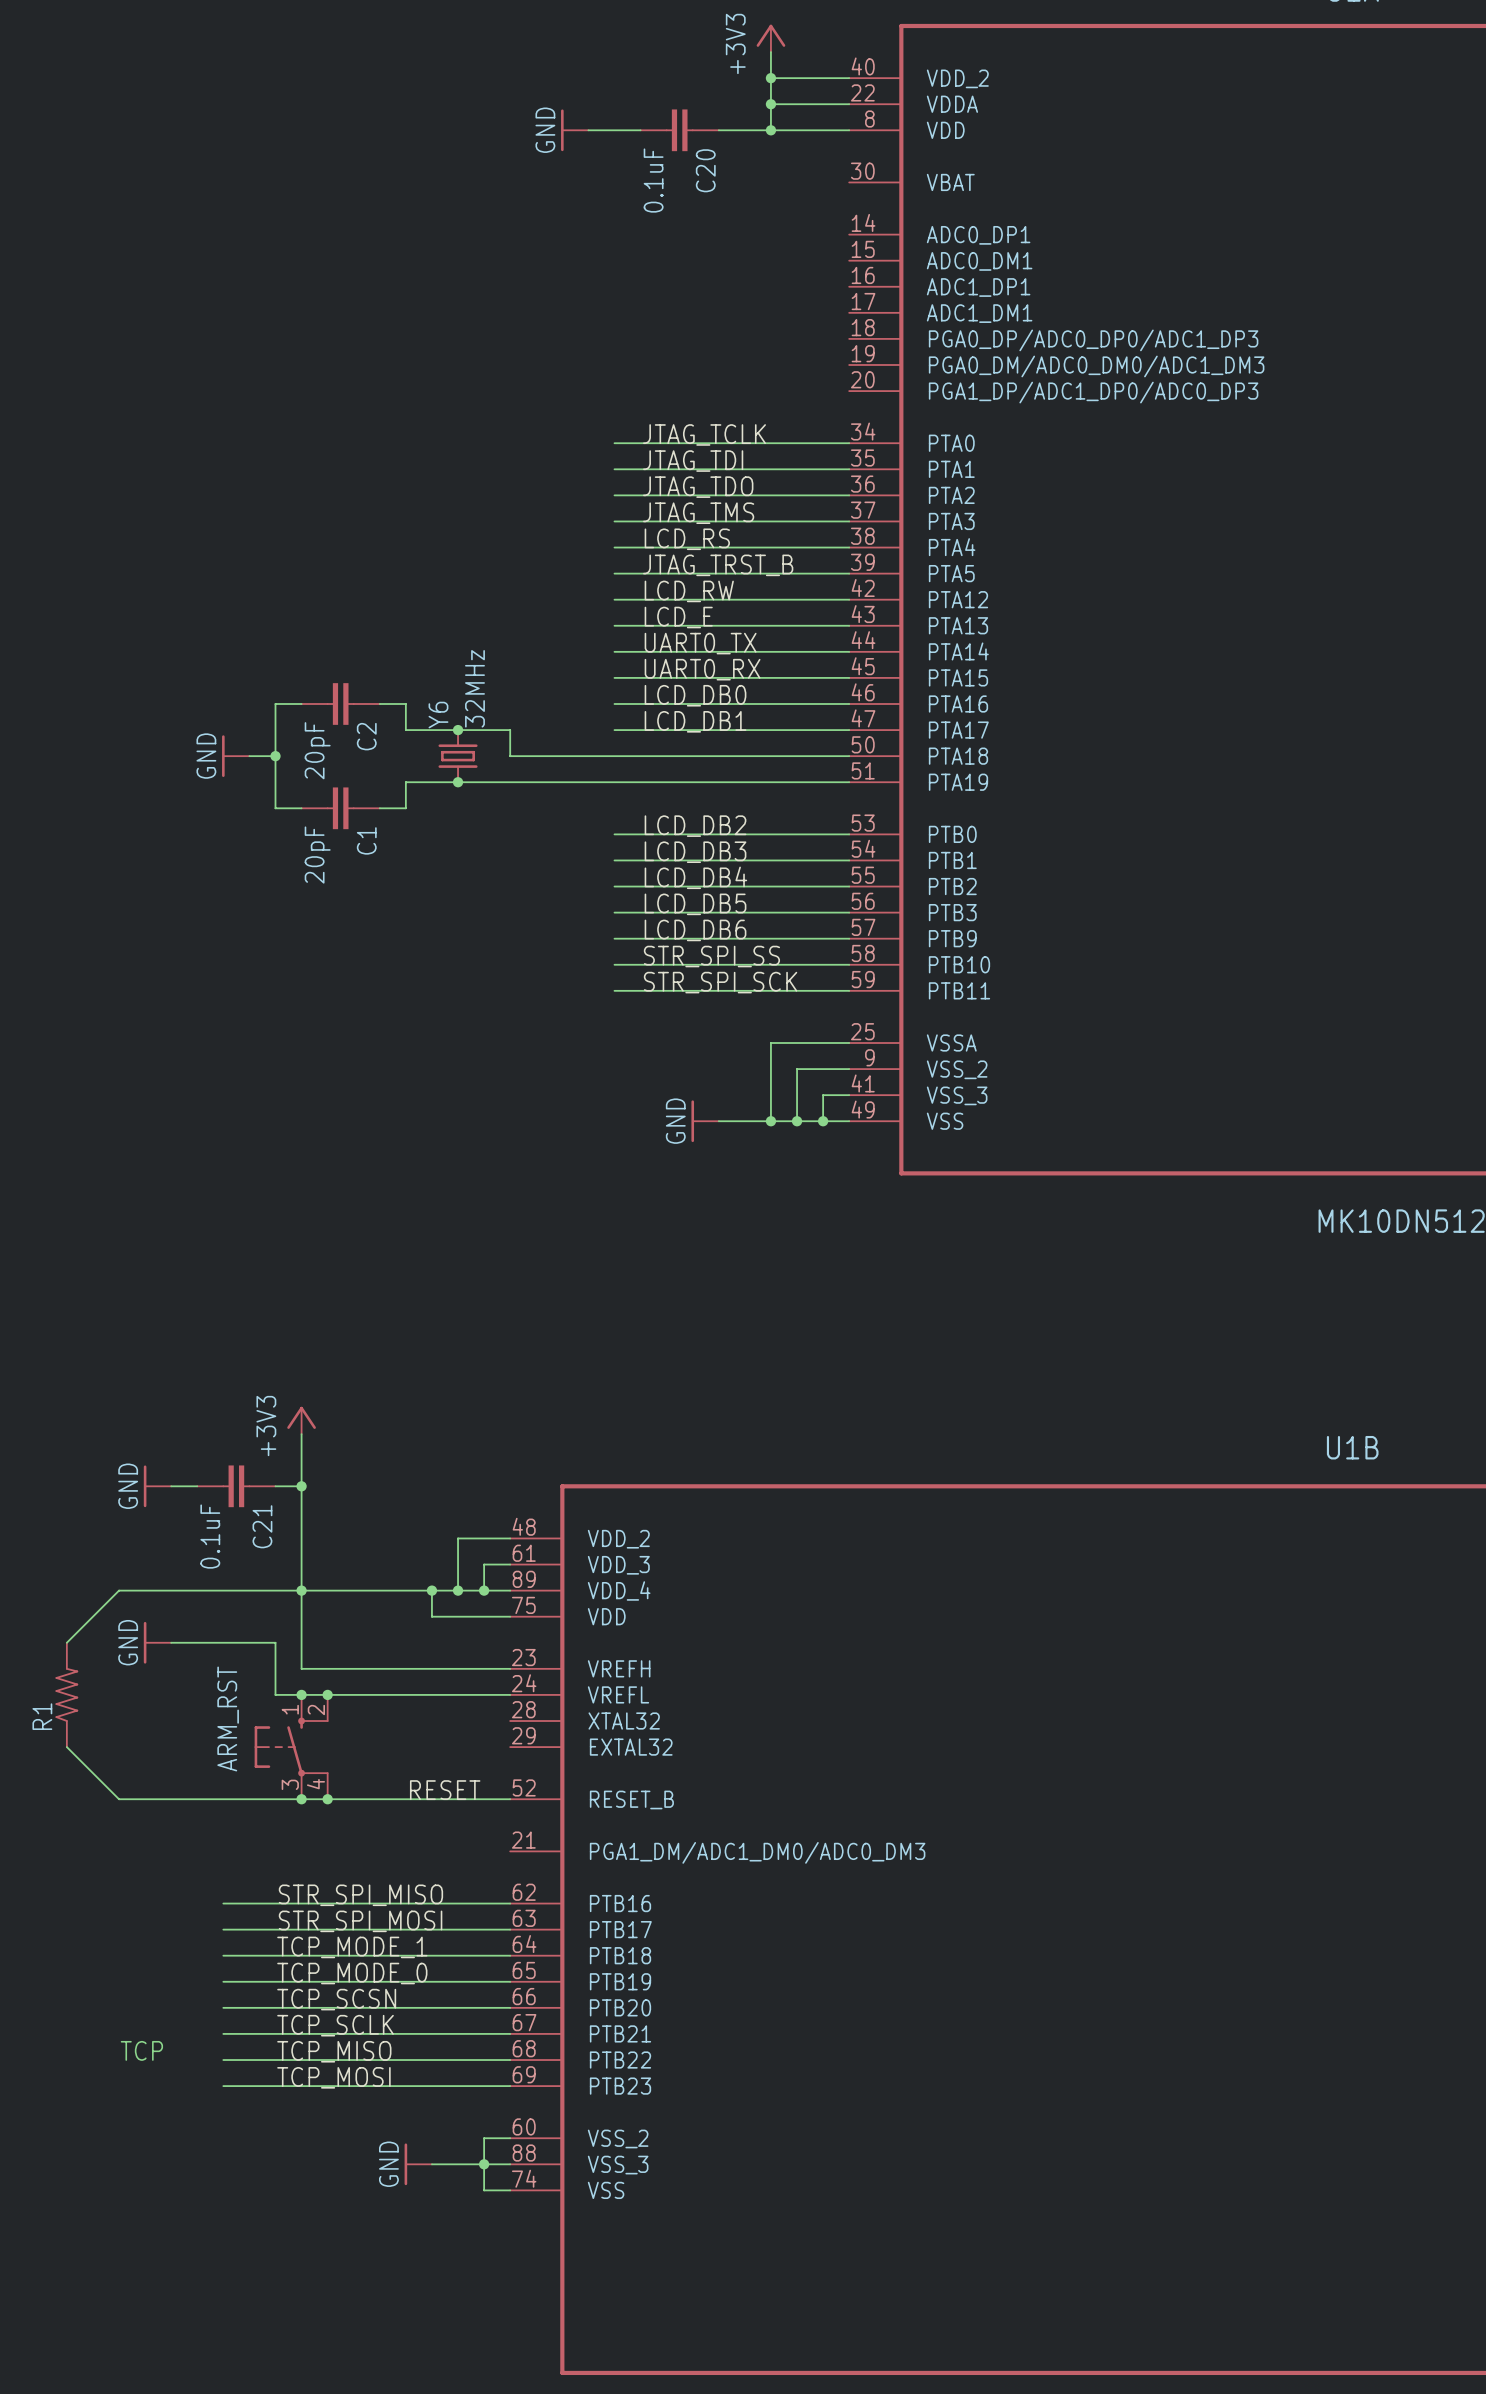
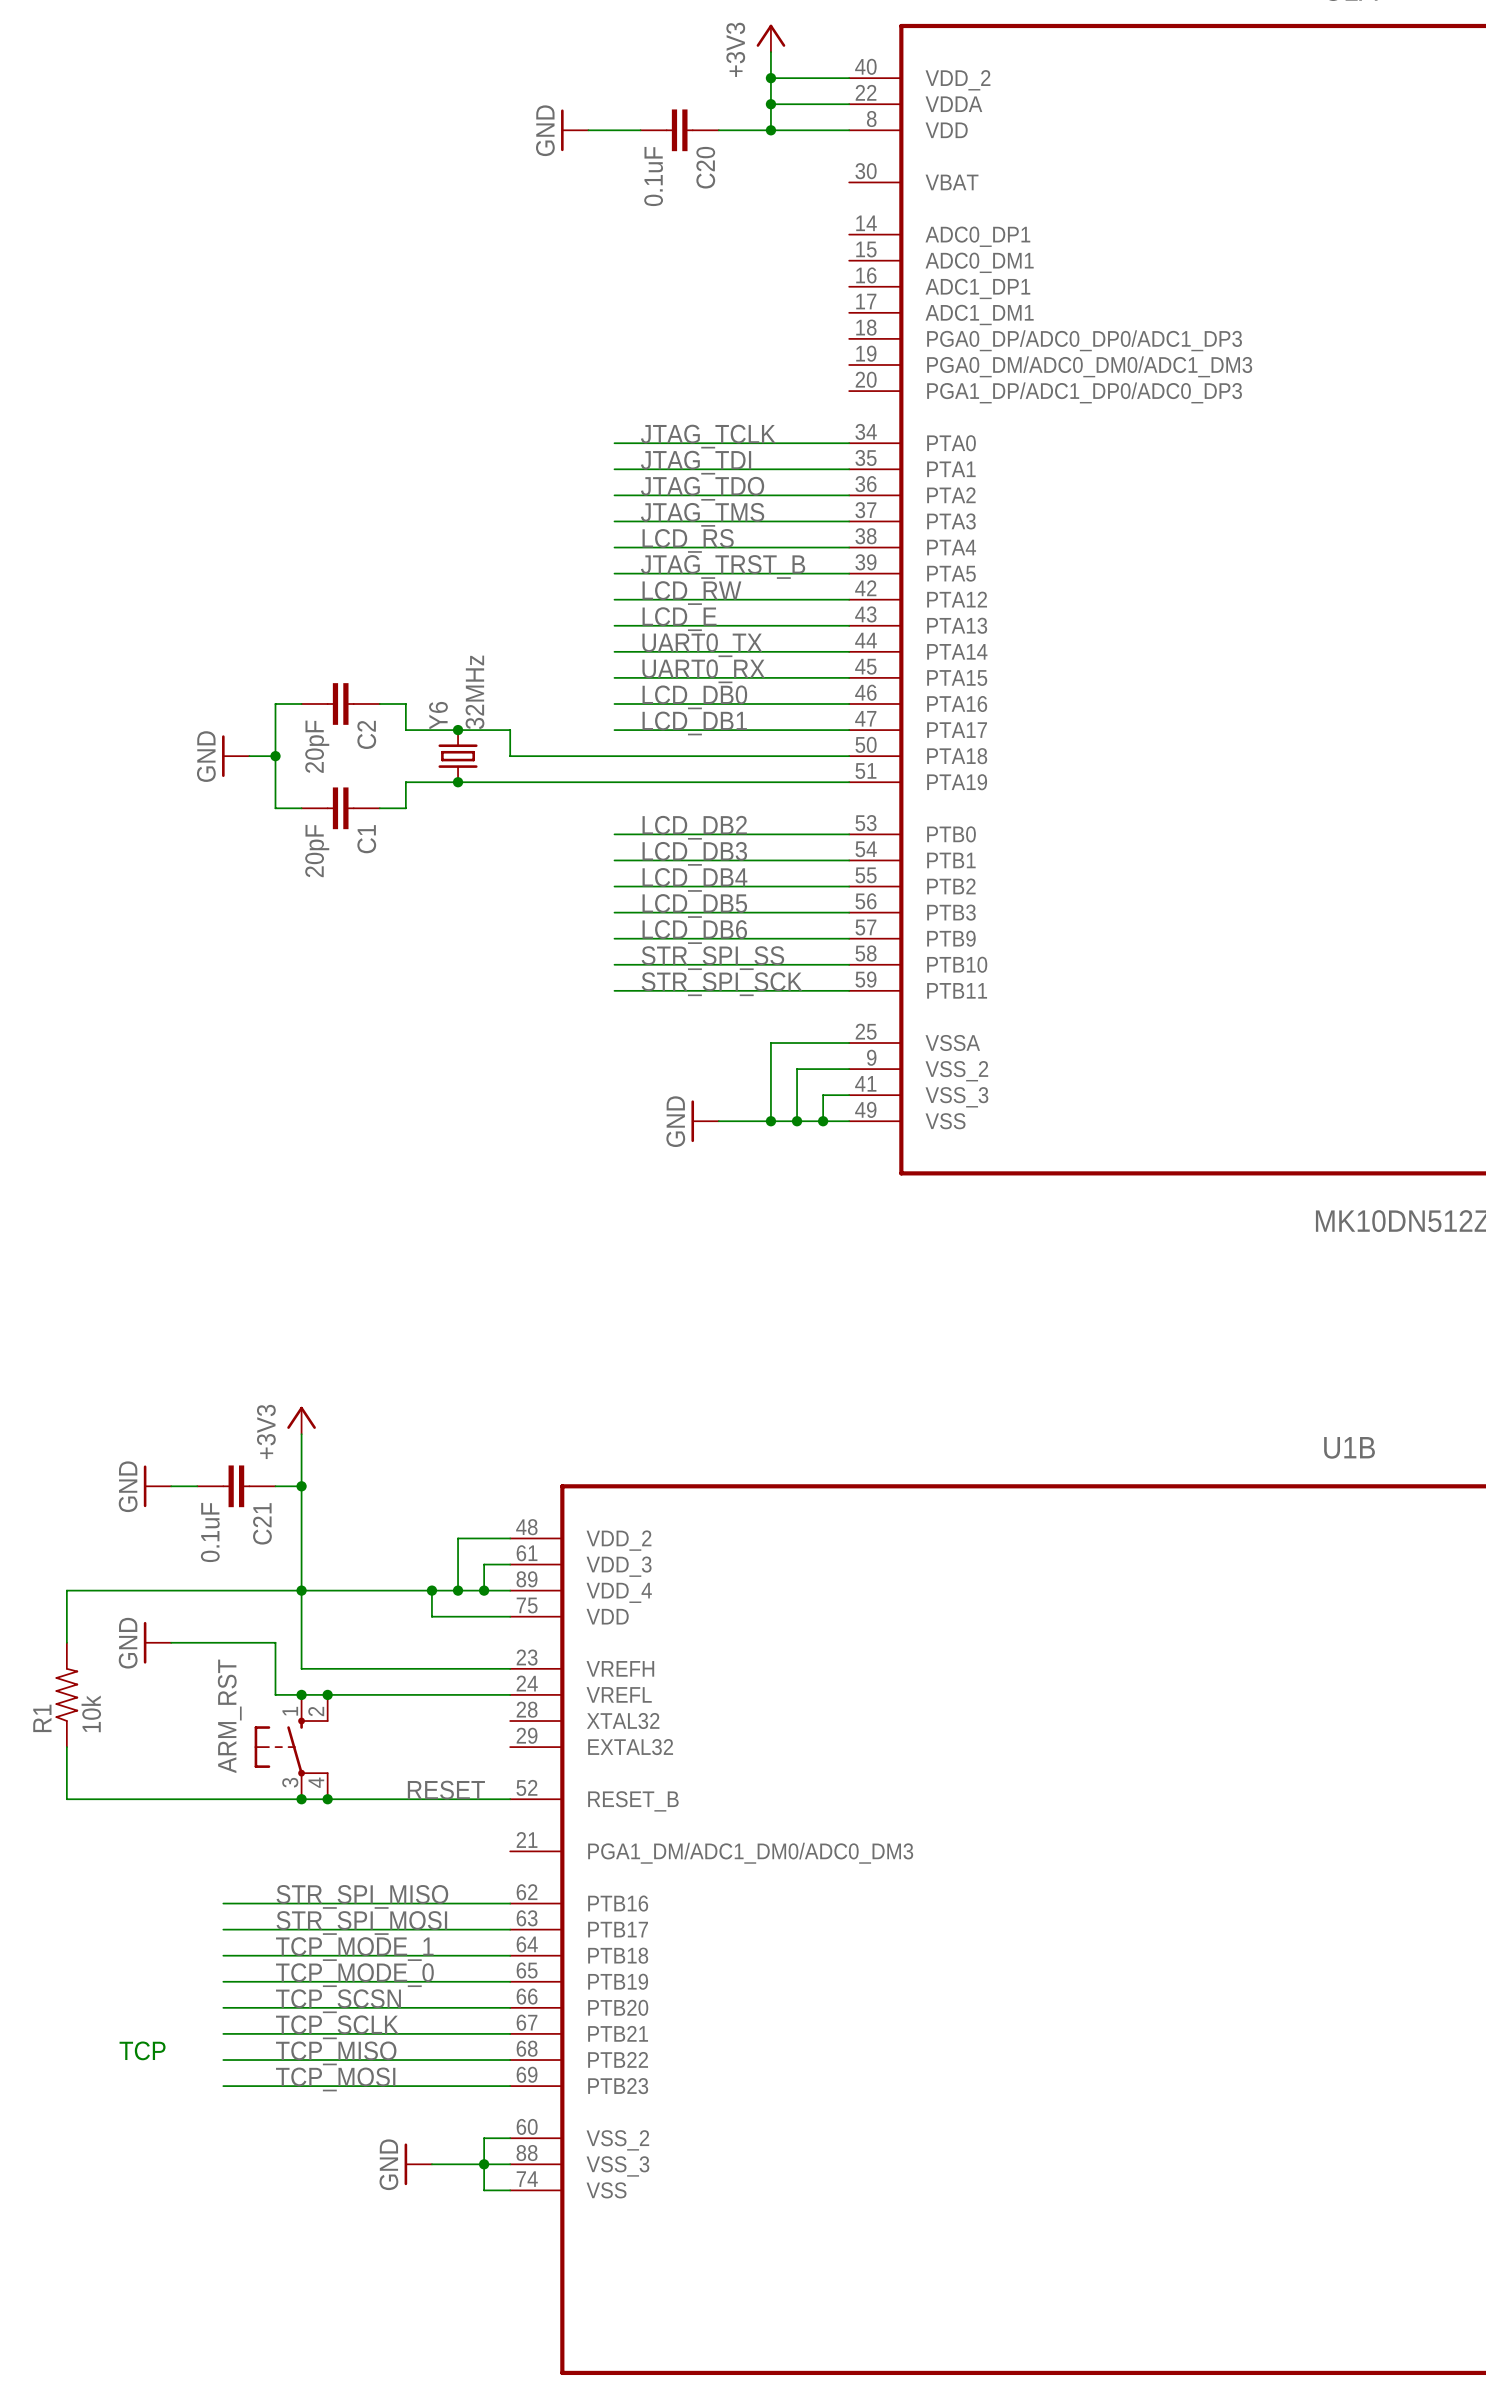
wire: (119, 1590) (66, 1642) -> (119, 1590) (66, 1590) (66, 1642)
R1 value: none -> 10k (91, 1713)
wire: (66, 1747) (119, 1799) -> (66, 1747) (66, 1799) (119, 1799)

